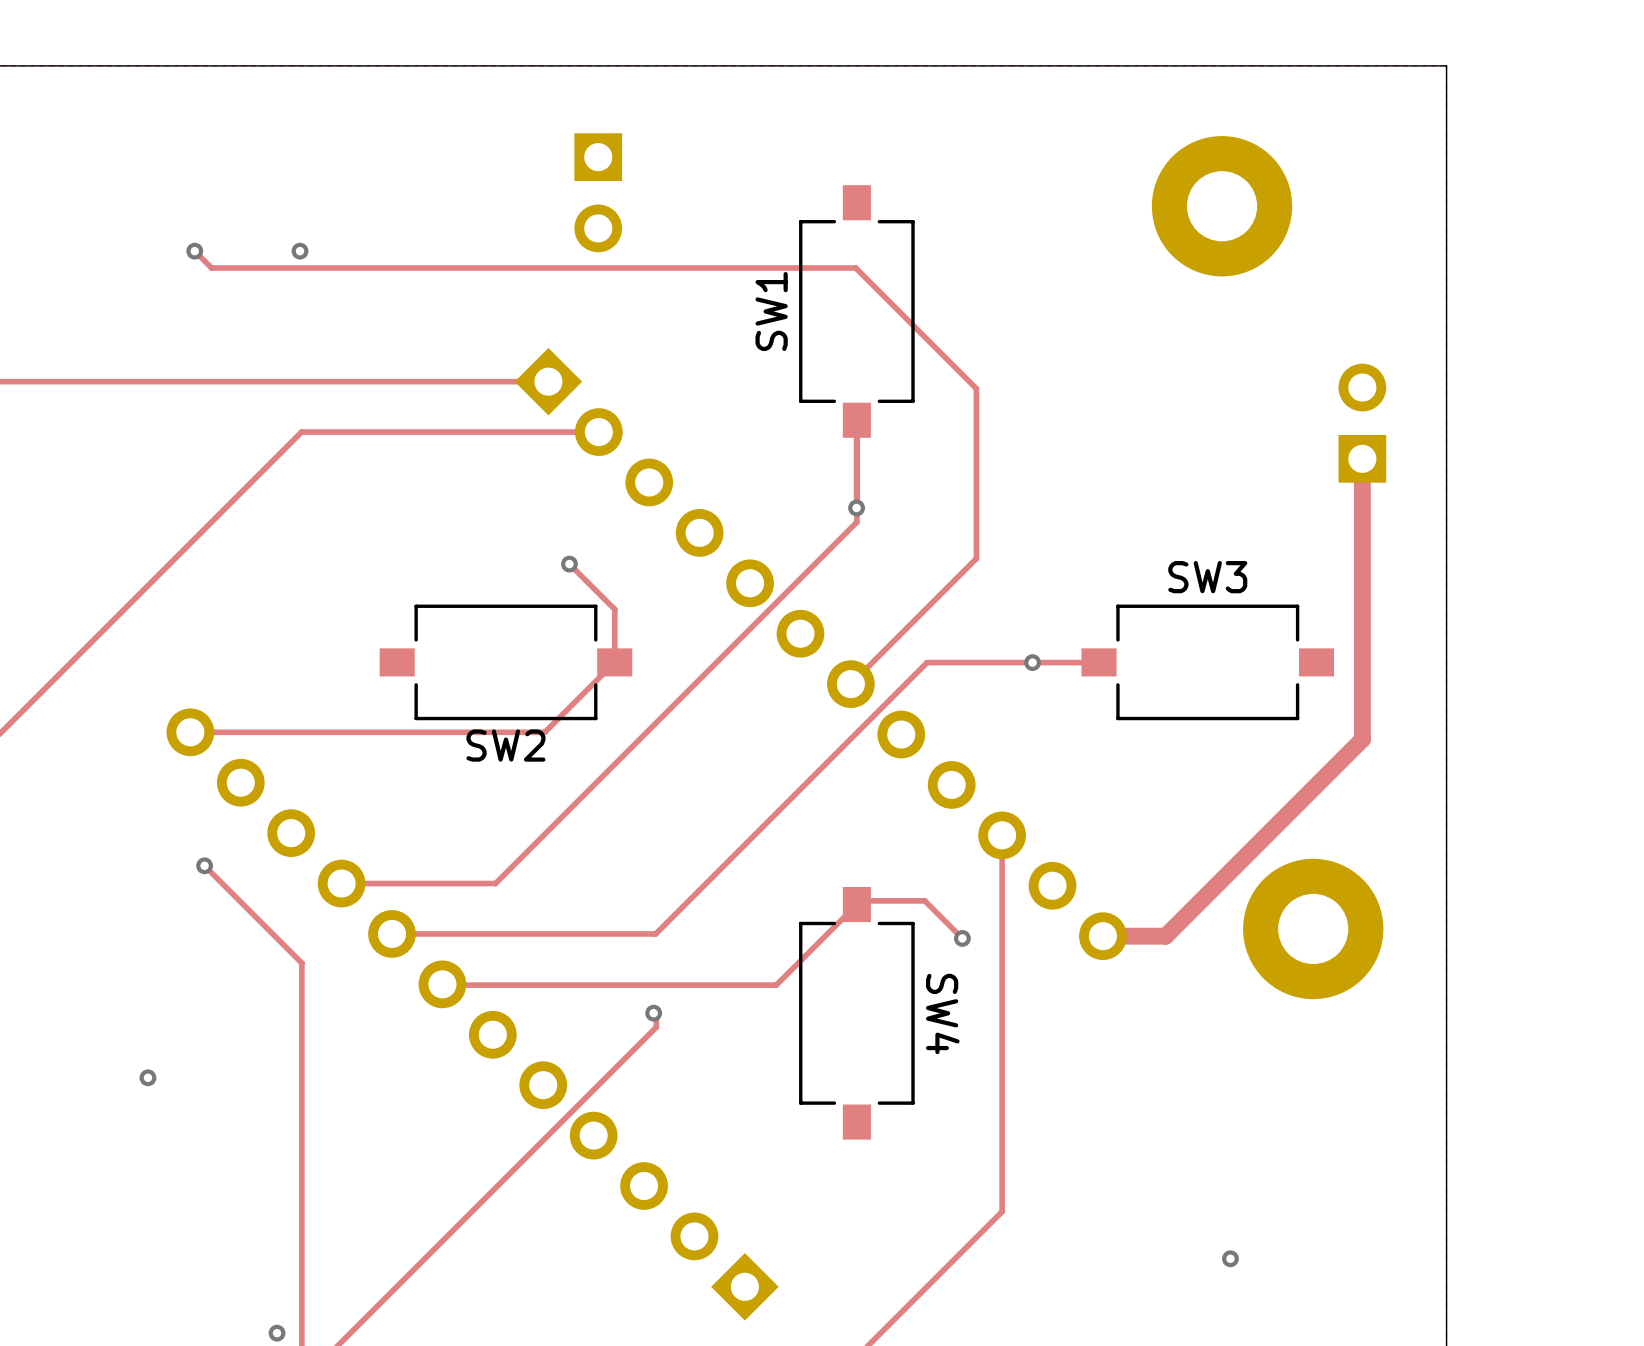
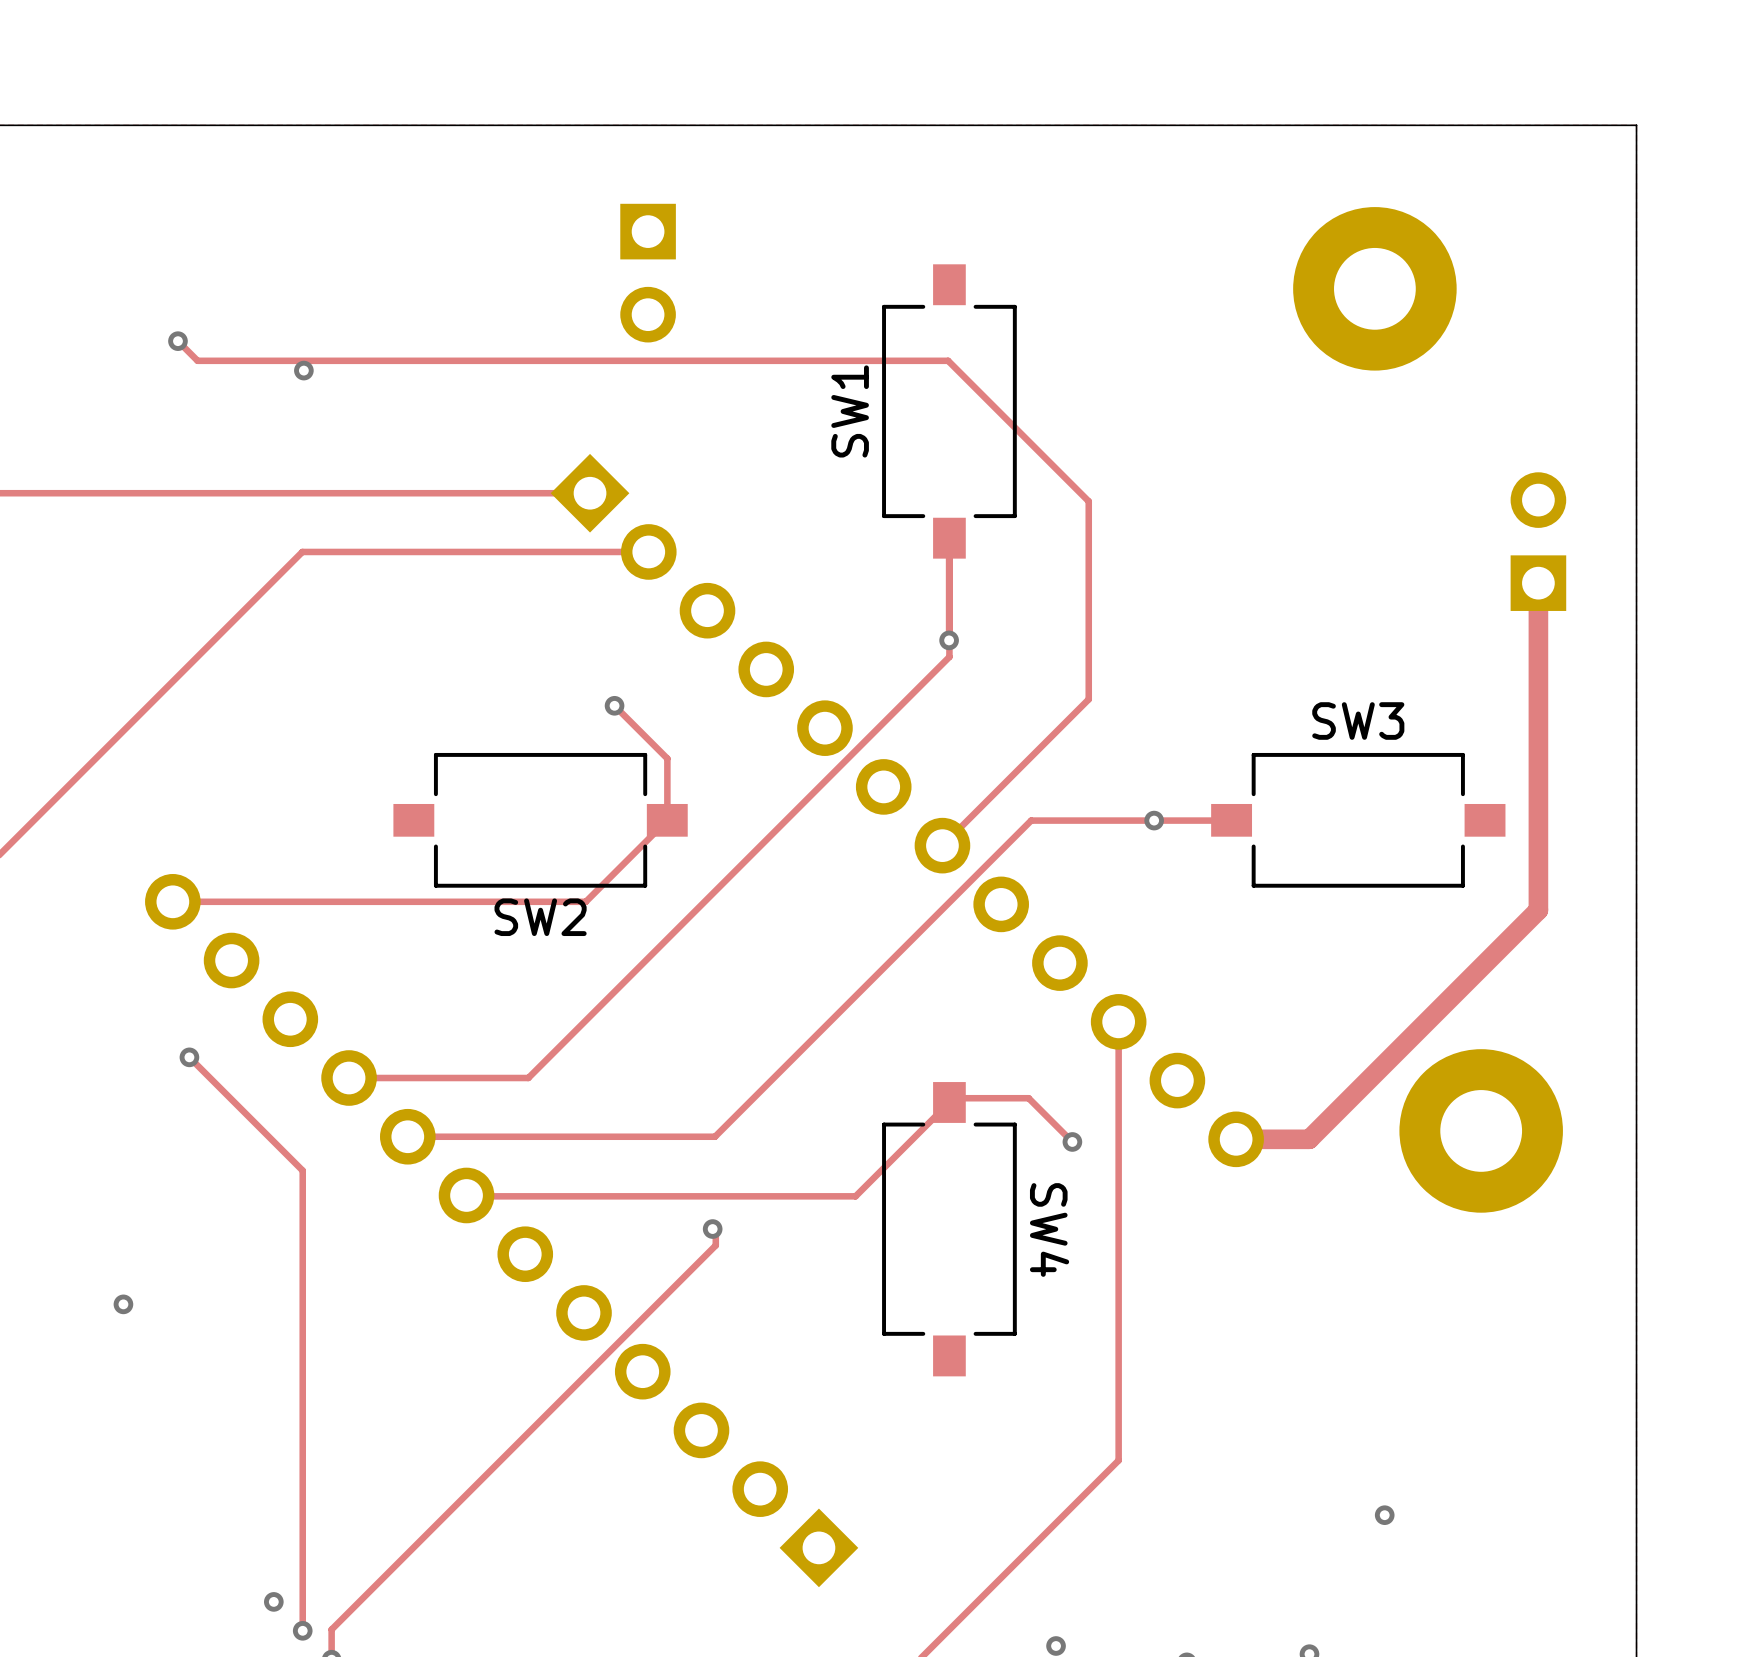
via position: (300, 251) -> (303, 370)

